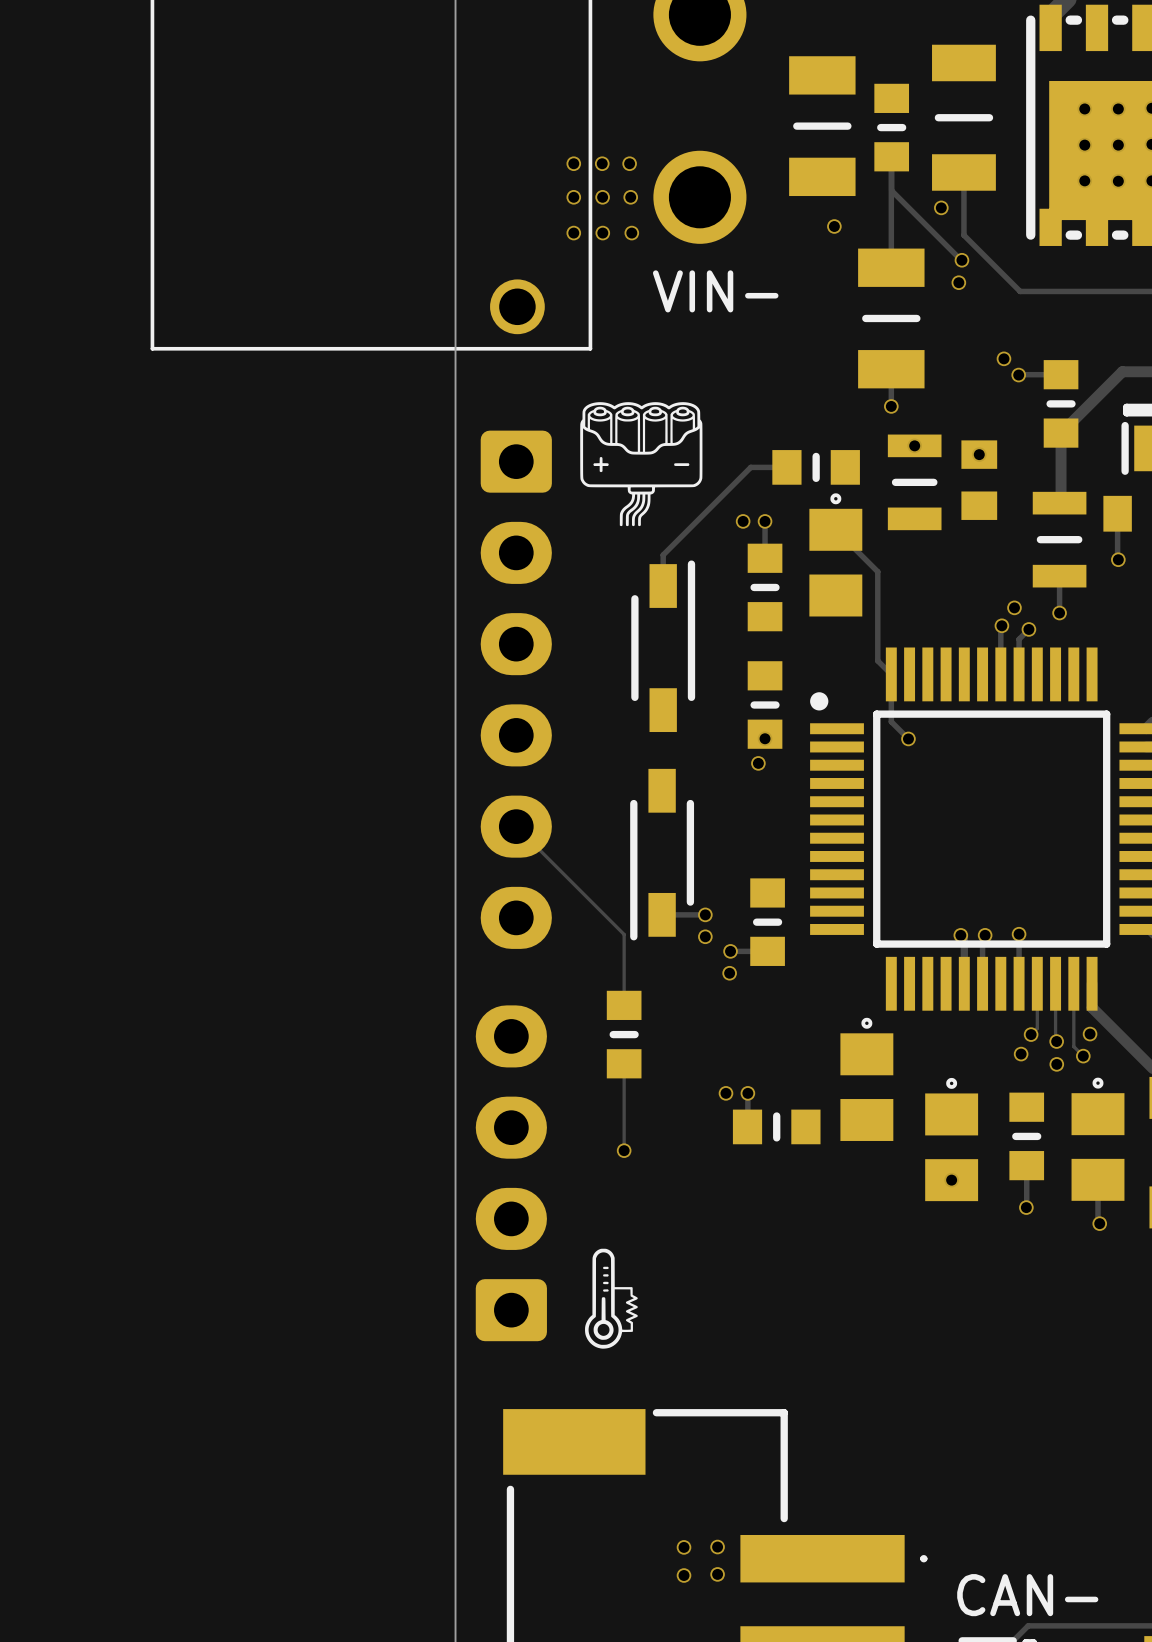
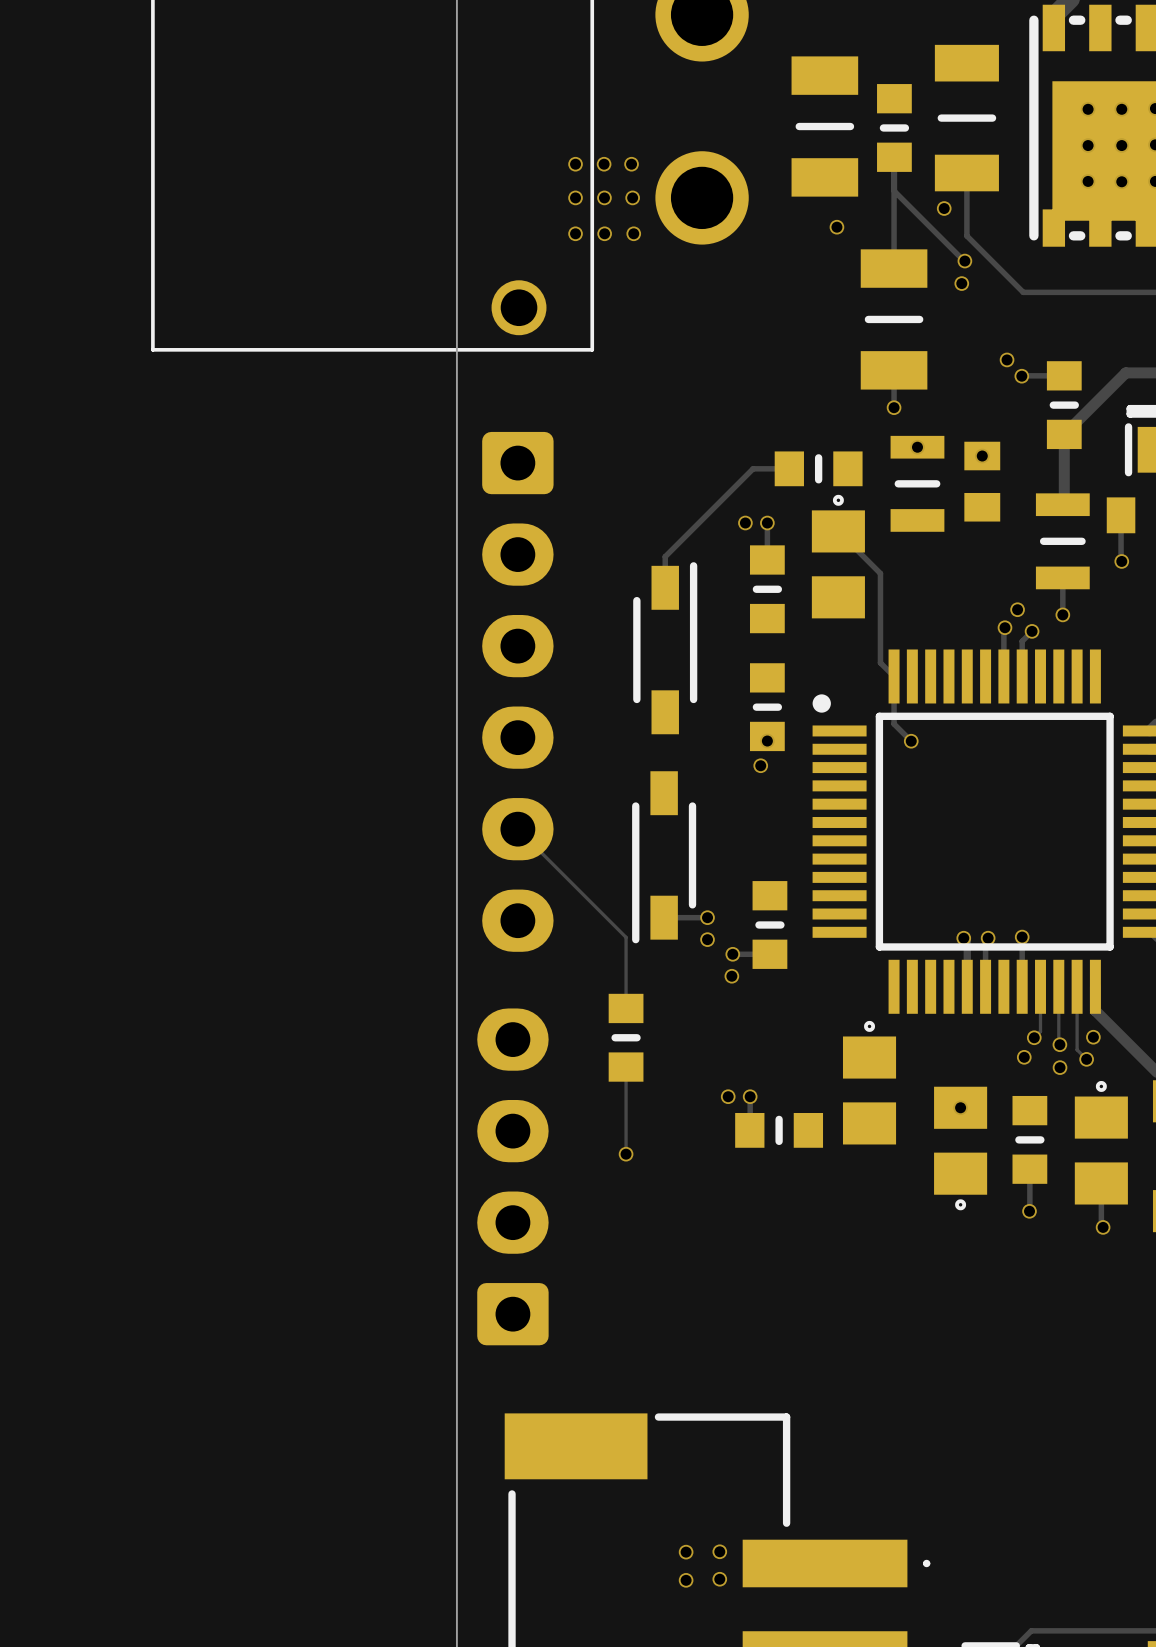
text: VIN- (715, 291) -> none
drawing: [580, 402, 703, 527] -> none
part rotation: 0° (951, 1139) -> 180° (960, 1148)
via position: (951, 1180) -> (960, 1107)
drawing: [585, 1248, 638, 1349] -> none
text: CAN- (1027, 1595) -> none

